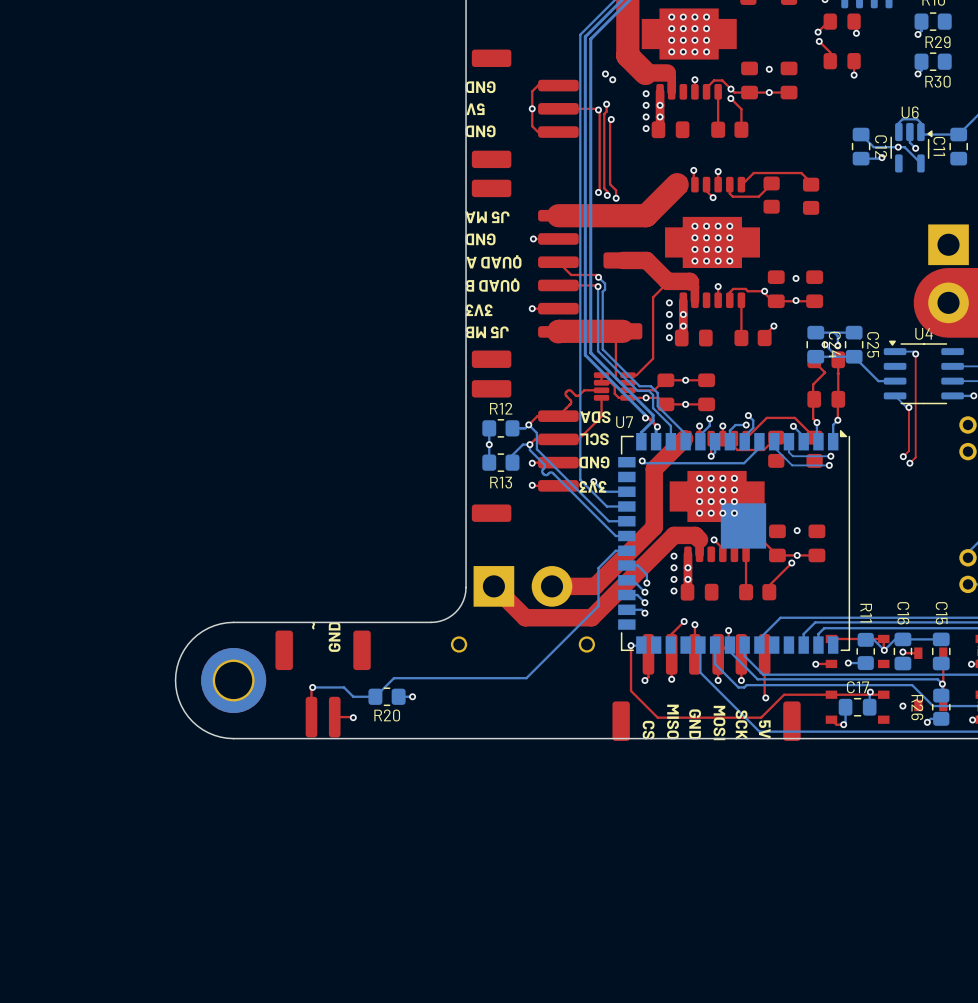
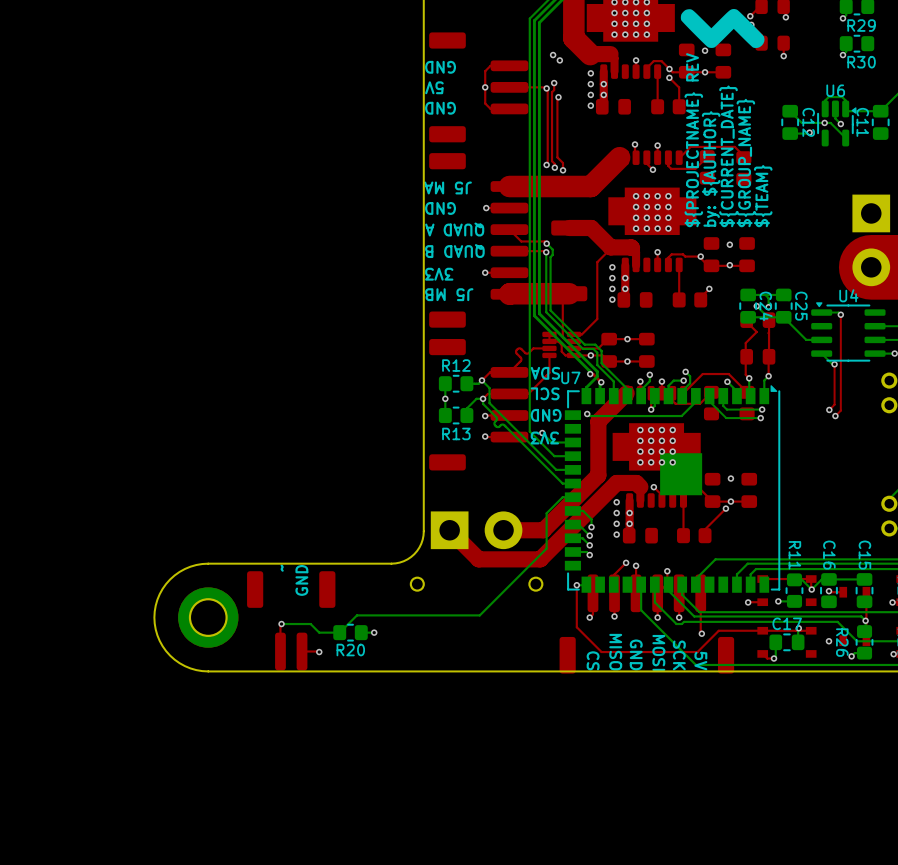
drawing: none -> [680, 9, 765, 49]
text: none -> ${PROJECTNAME} REV (693, 140)
text: none -> ${CURRENT_DATE} (728, 156)
text: none -> ${GROUP_NAME} (745, 163)
text: none -> by: ${AUTHOR} (711, 168)
text: none -> ${TEAM} (763, 196)

